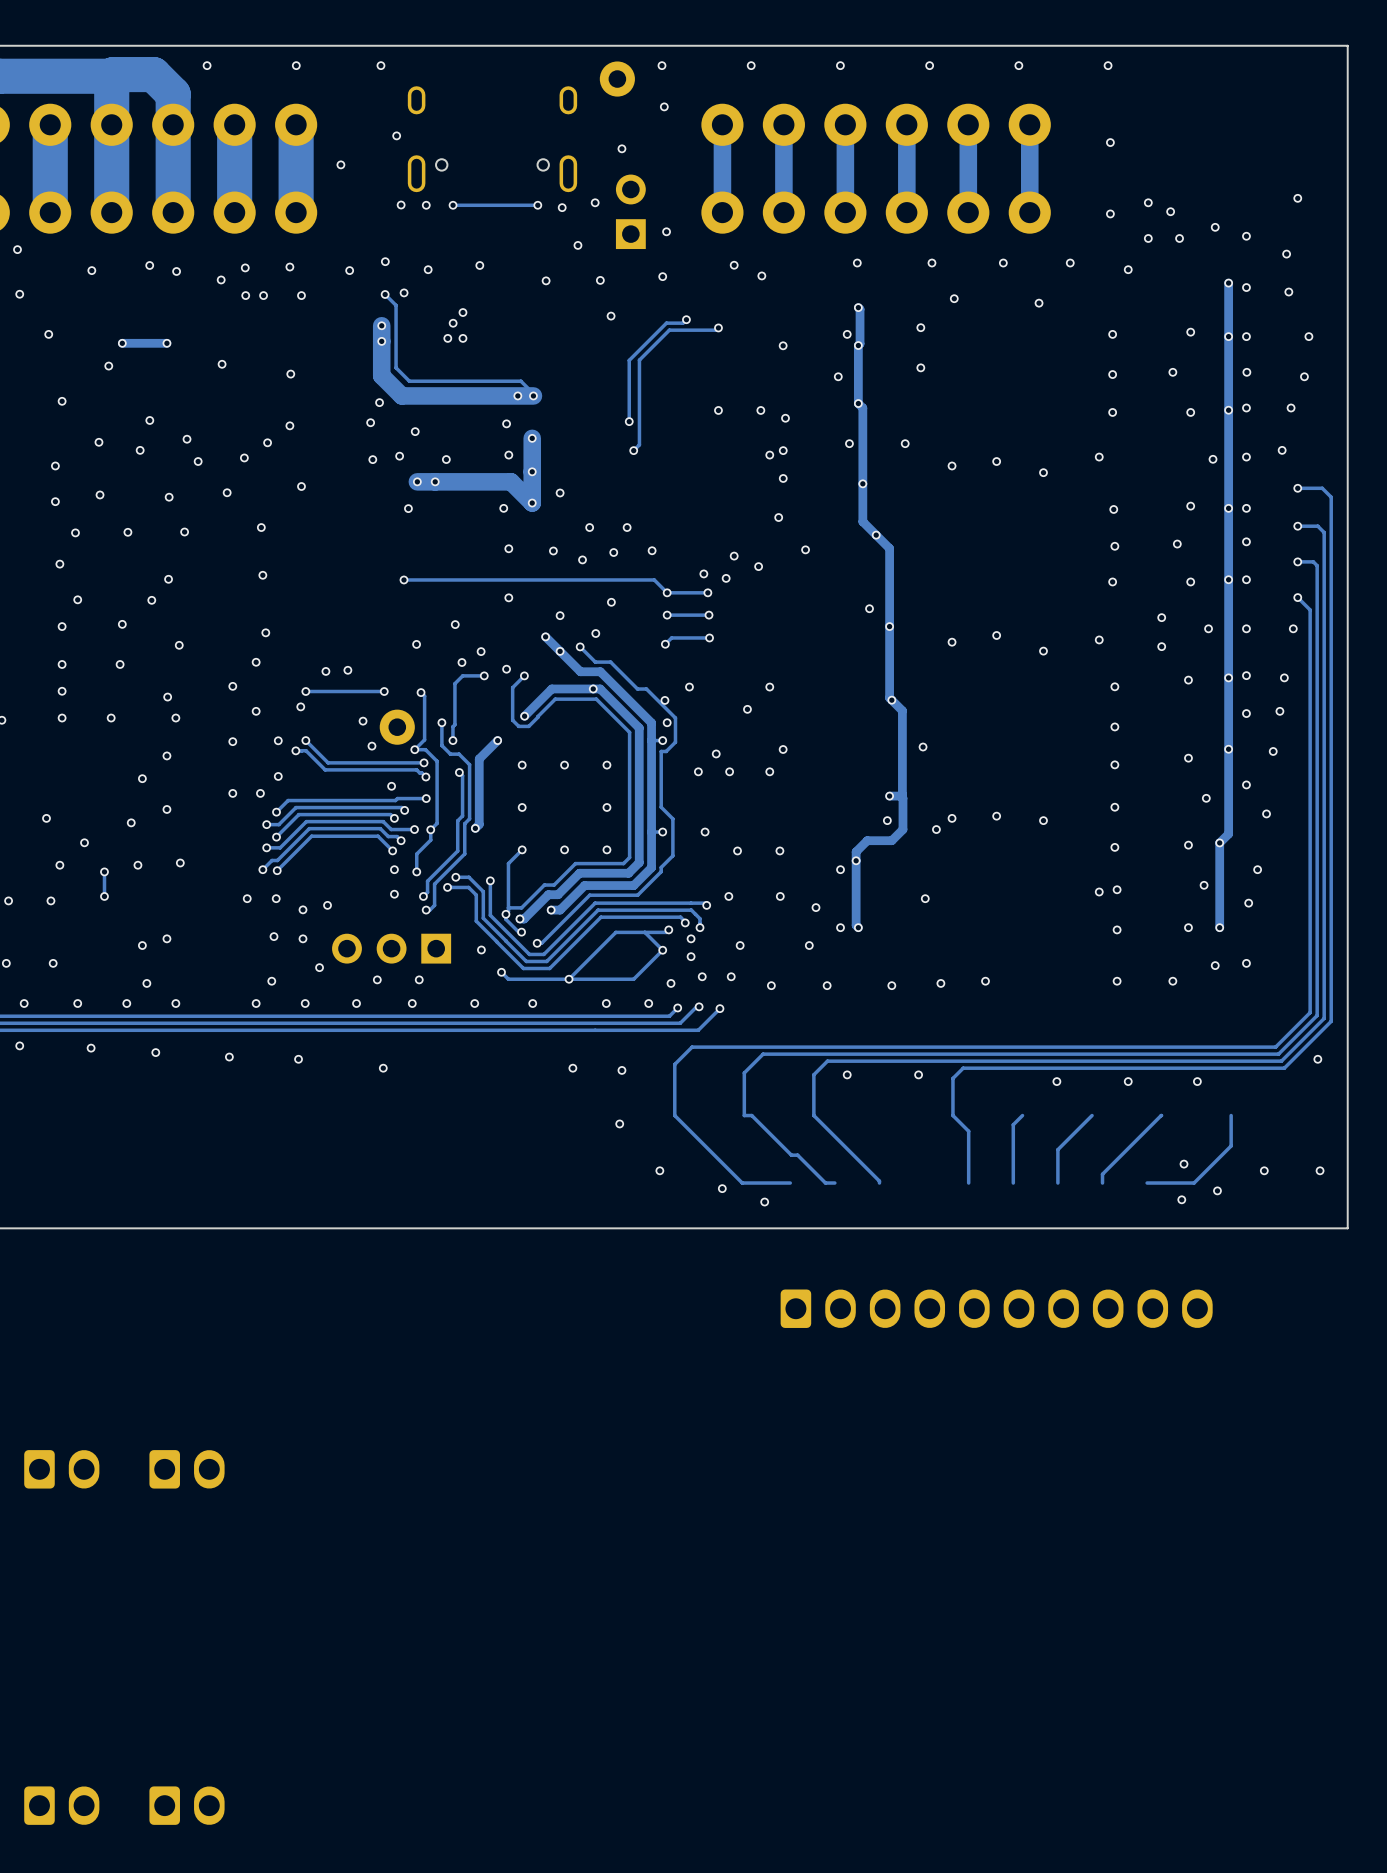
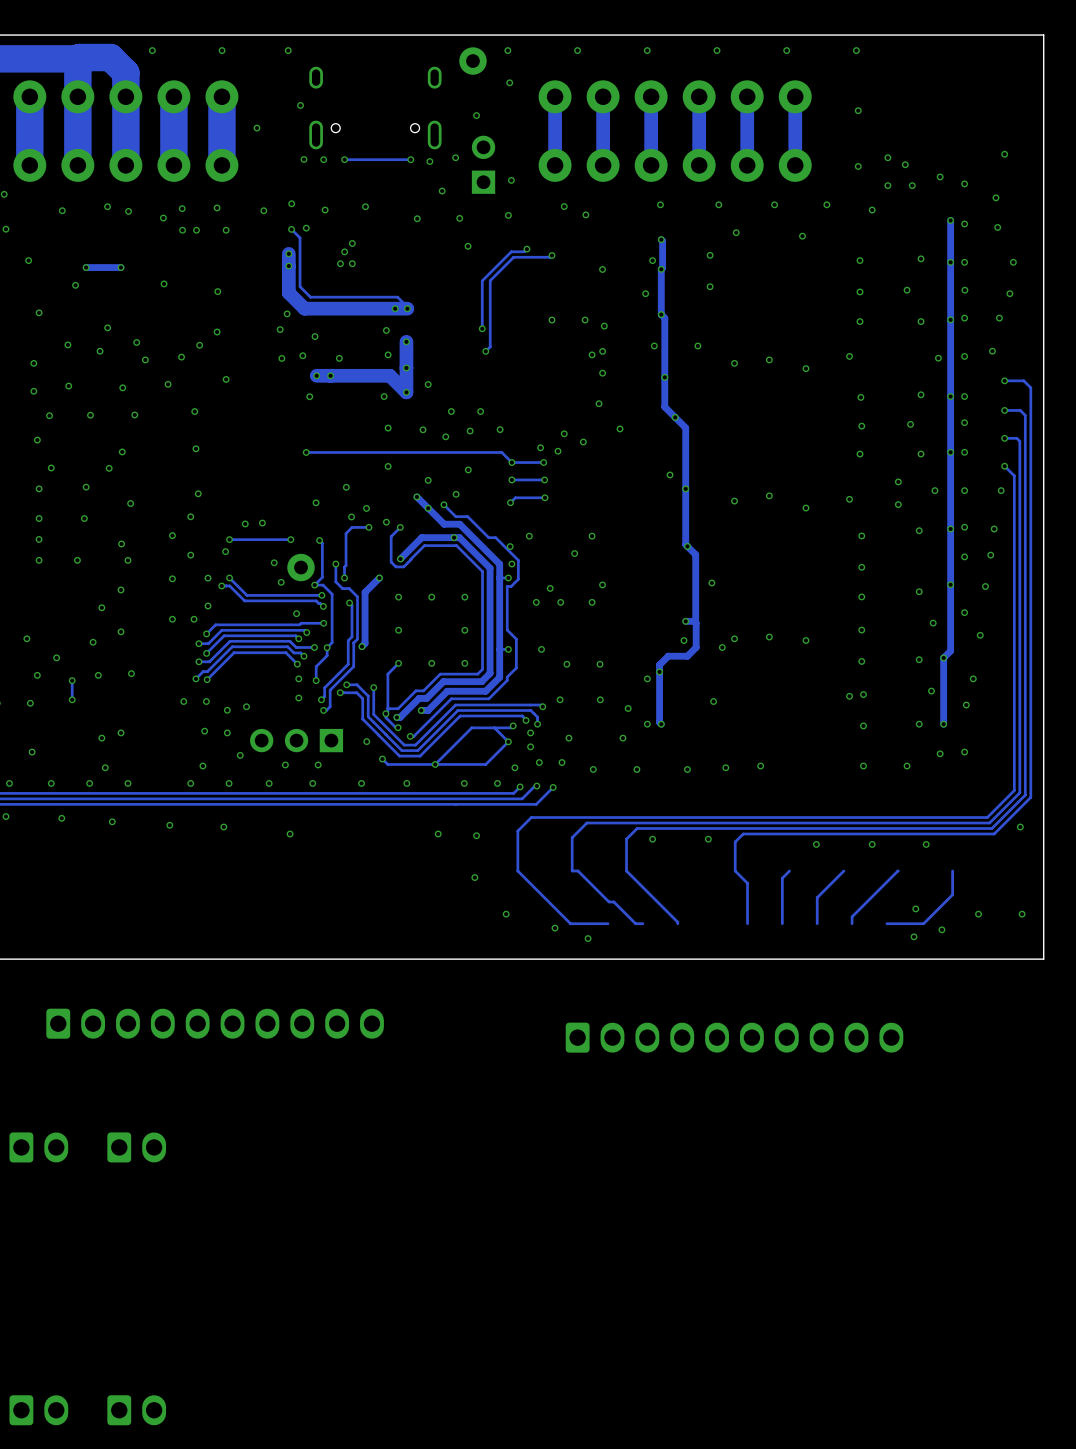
part position: (996, 1308) -> (734, 1037)
part: none -> (215, 1023)

